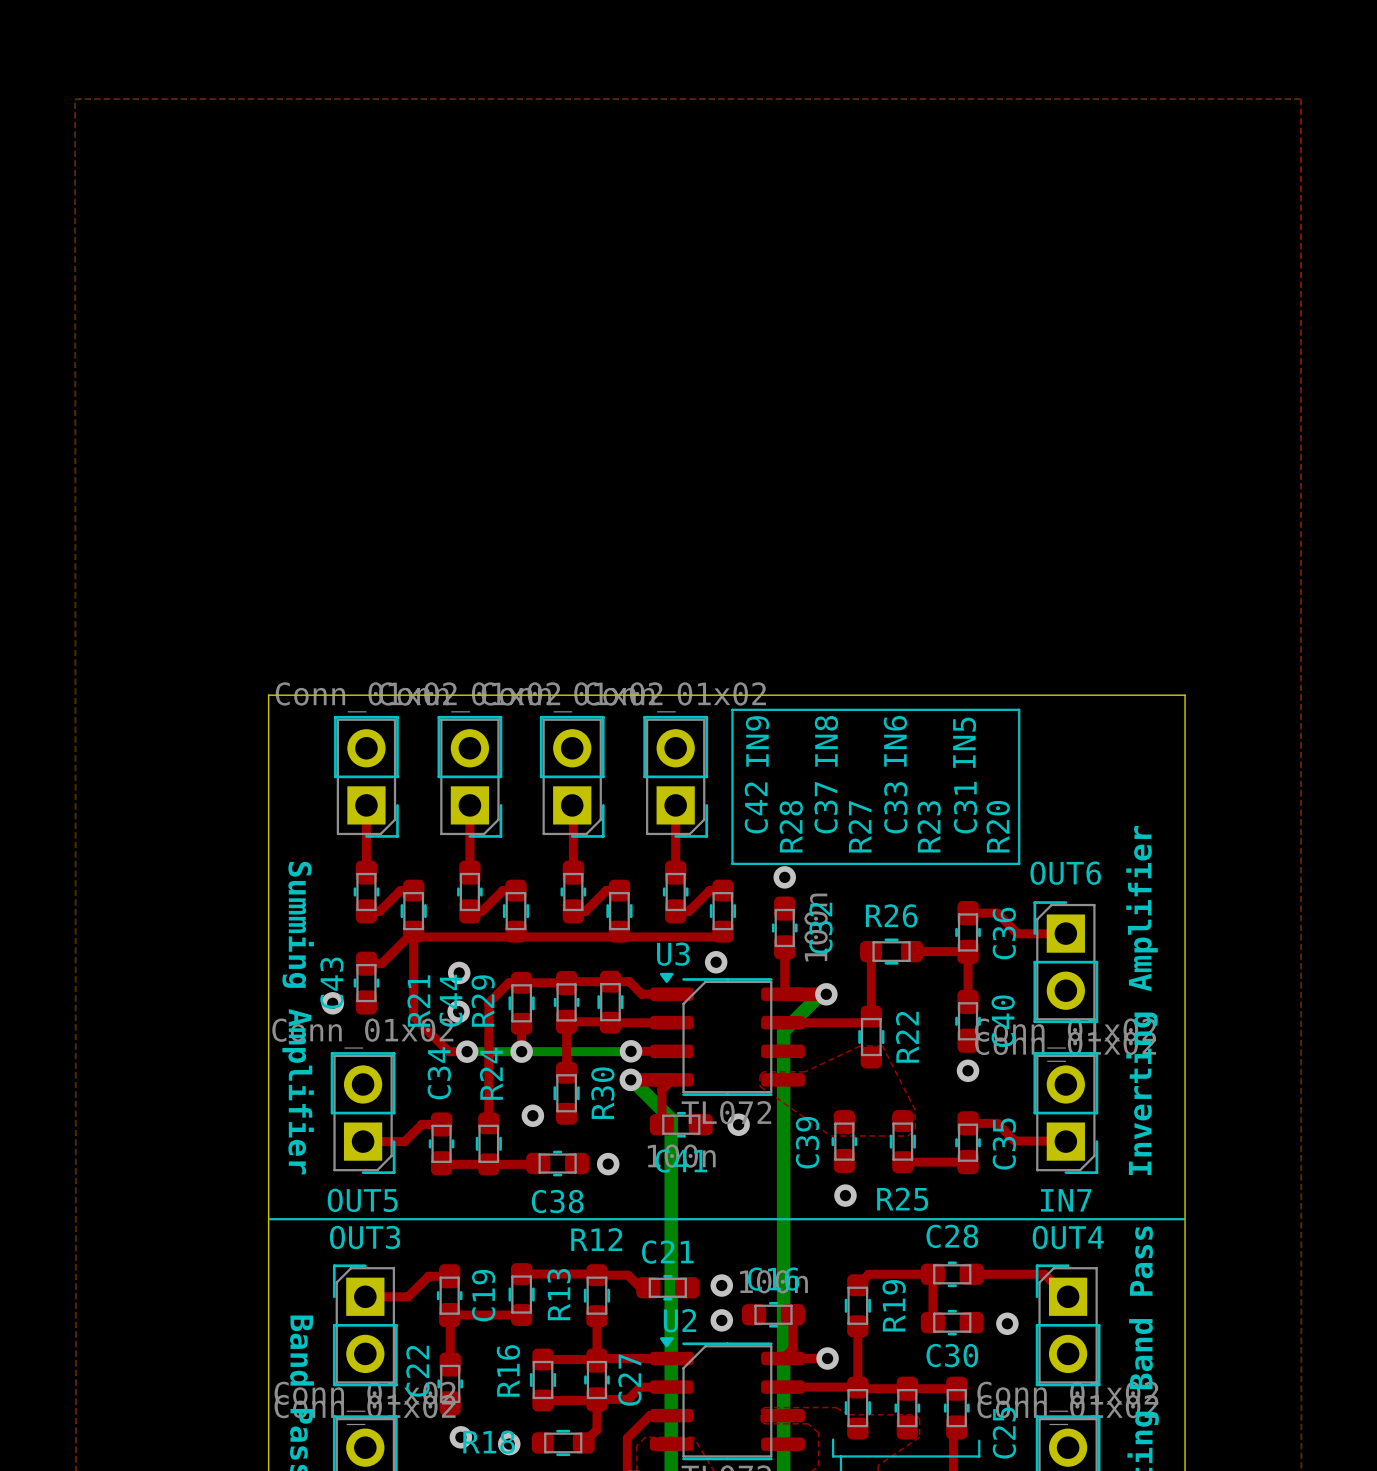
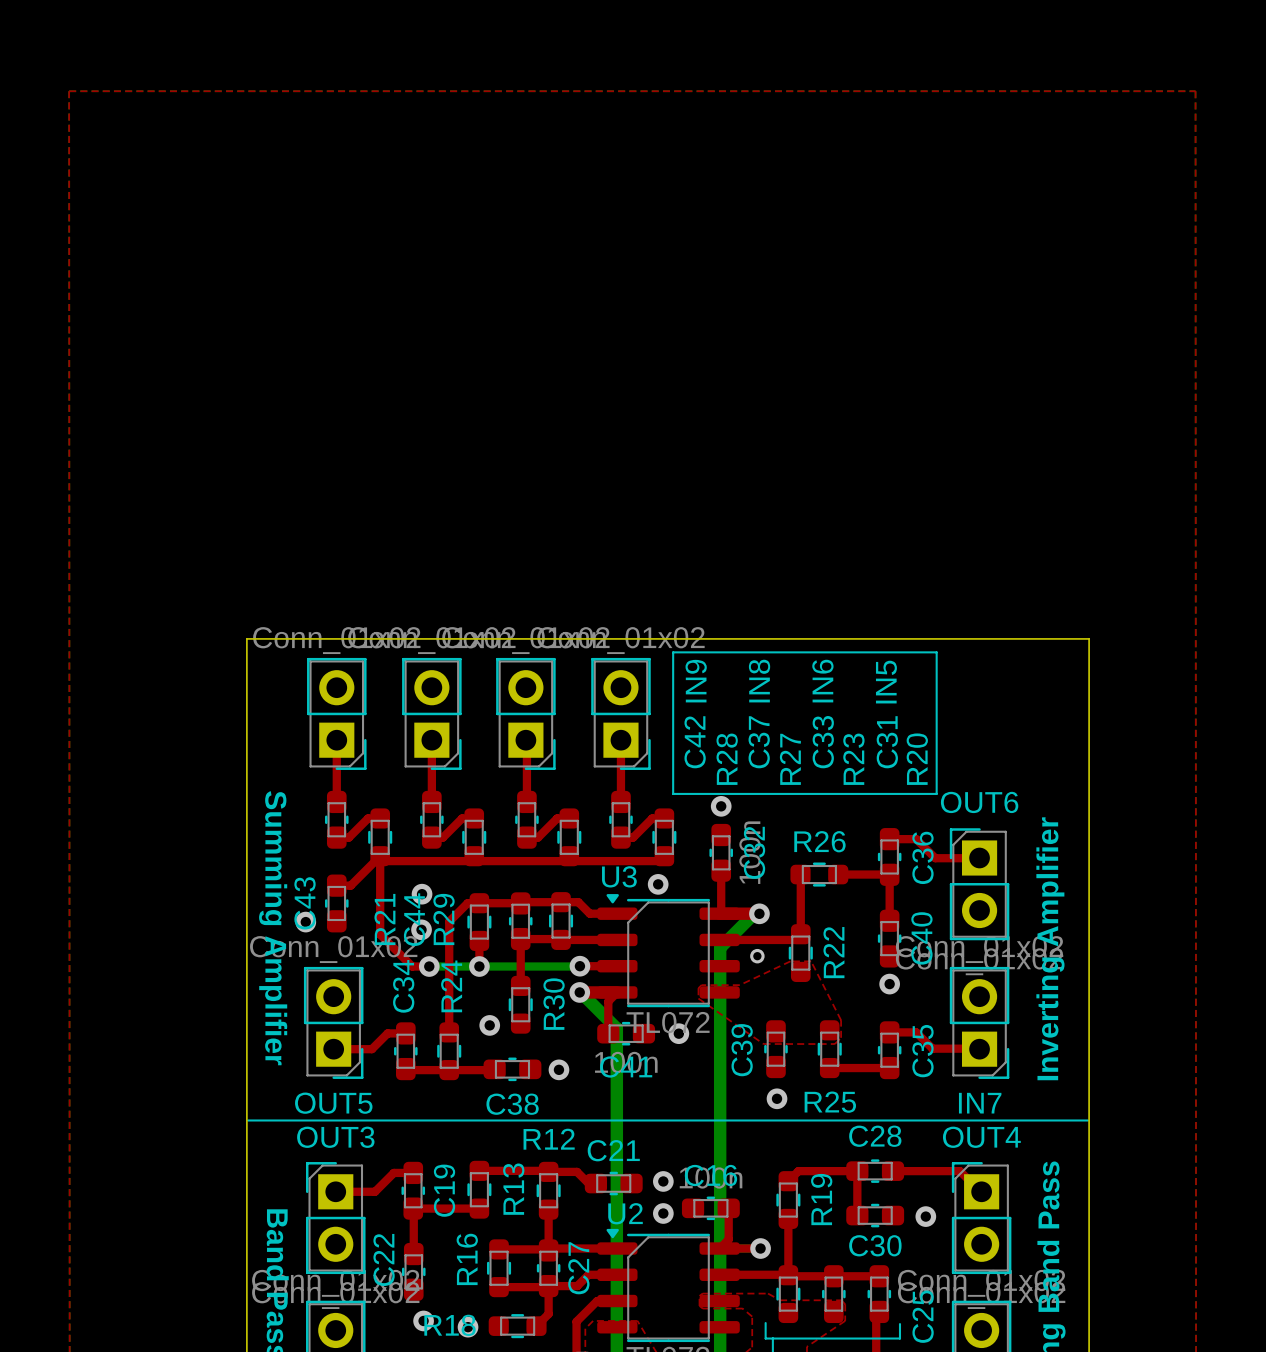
via: none -> (757, 956)

